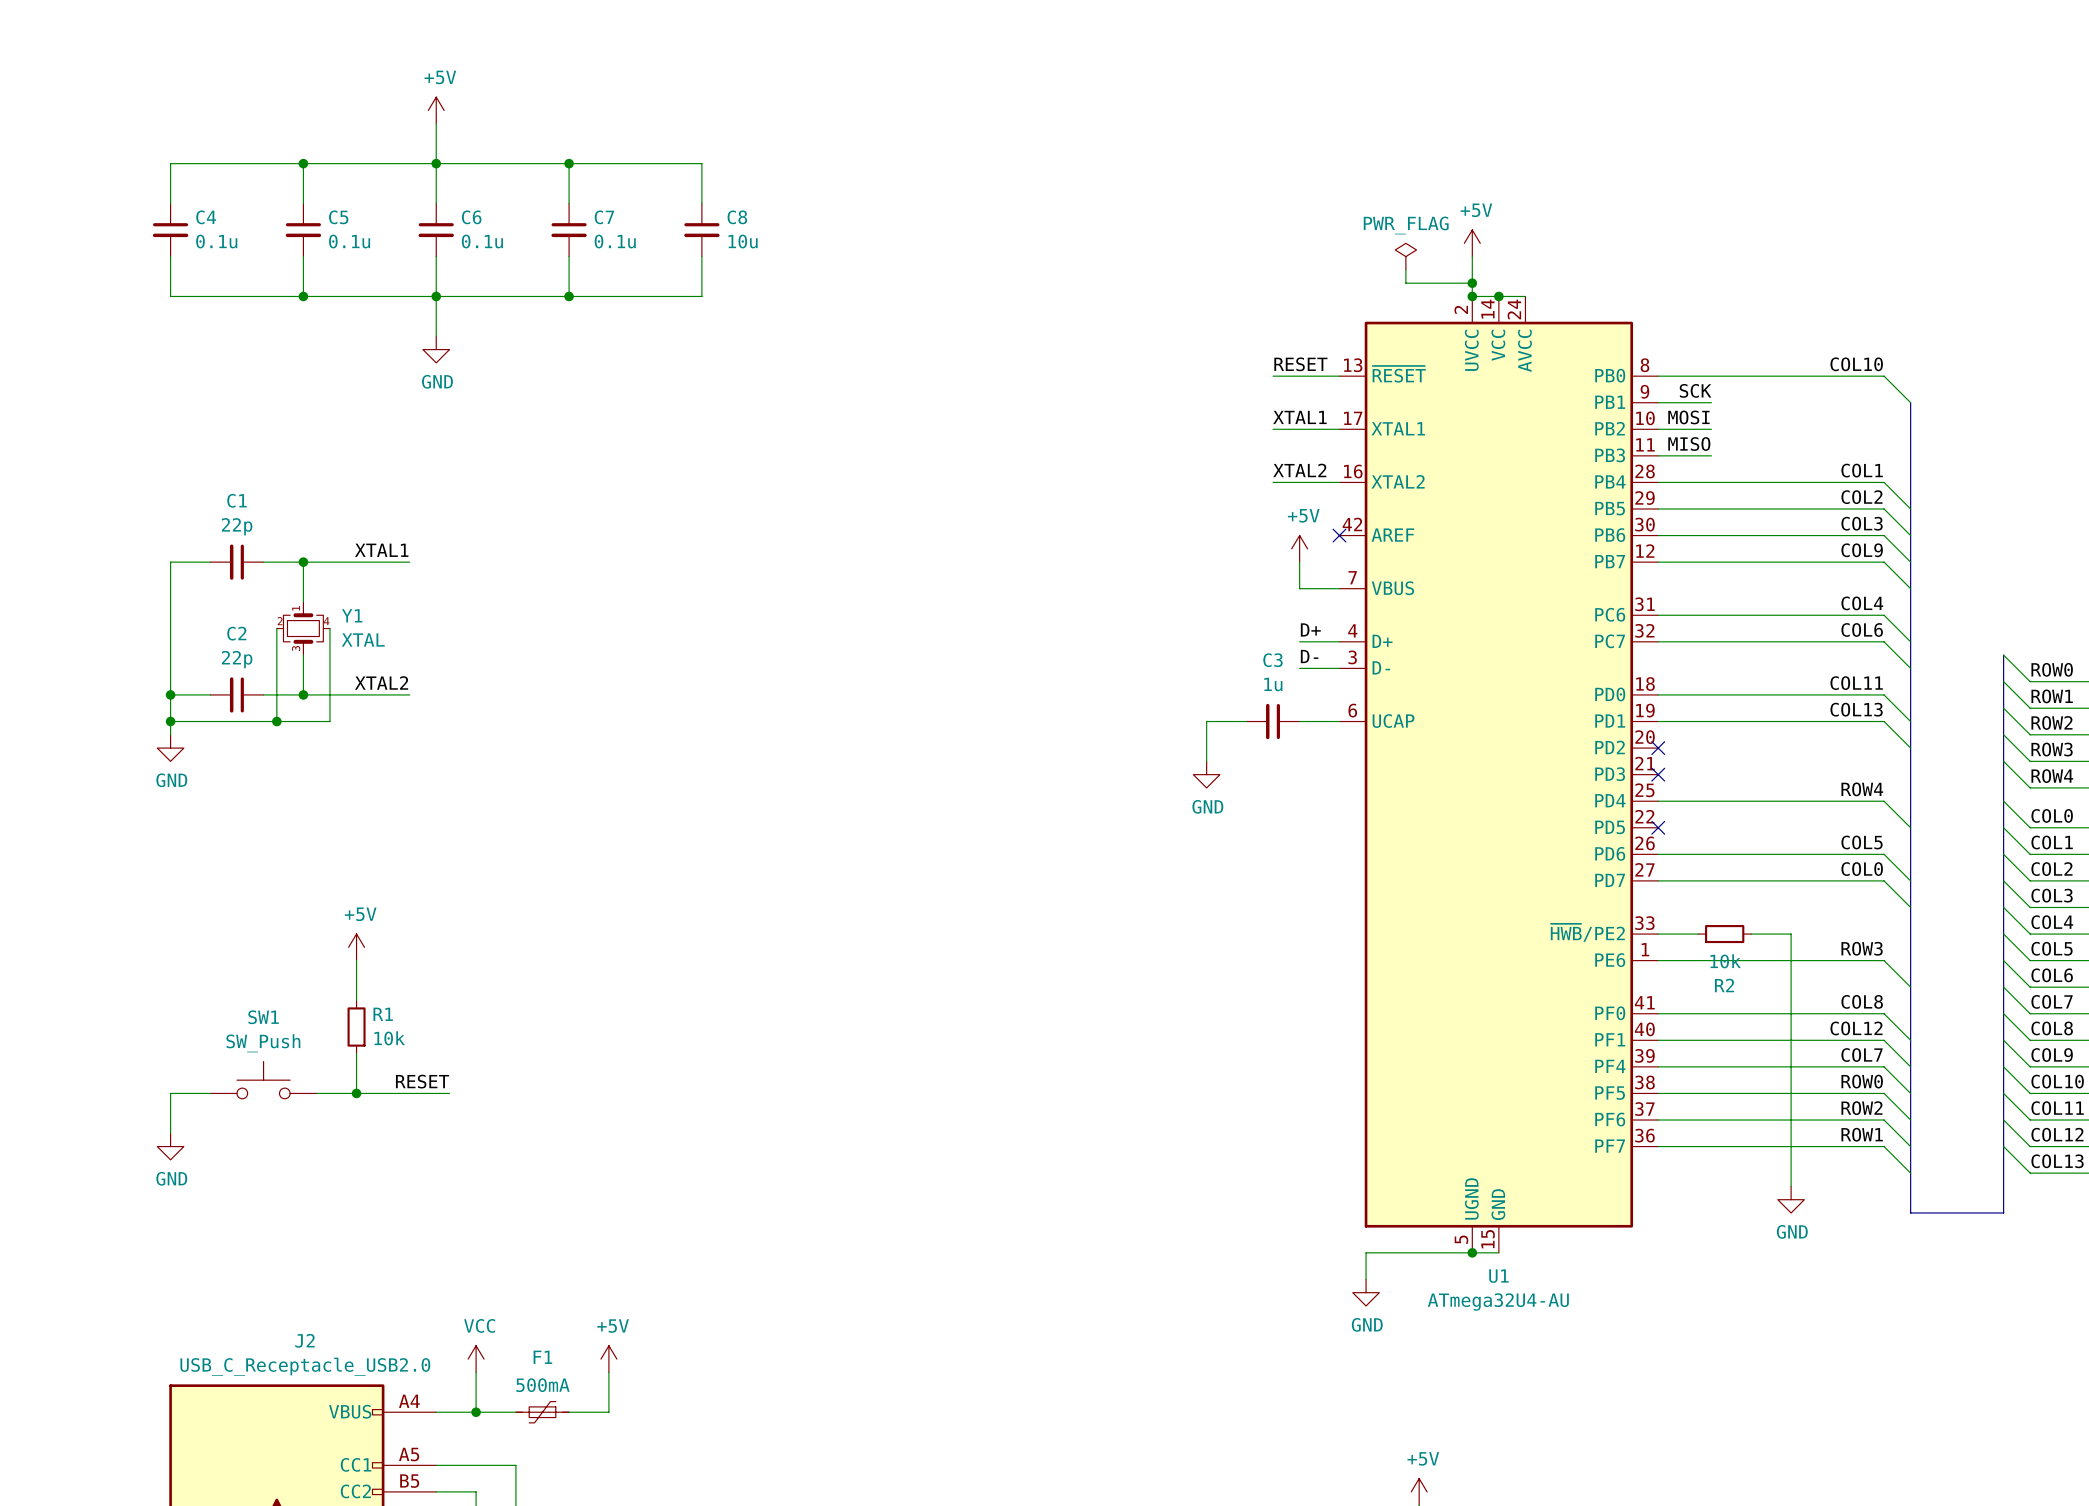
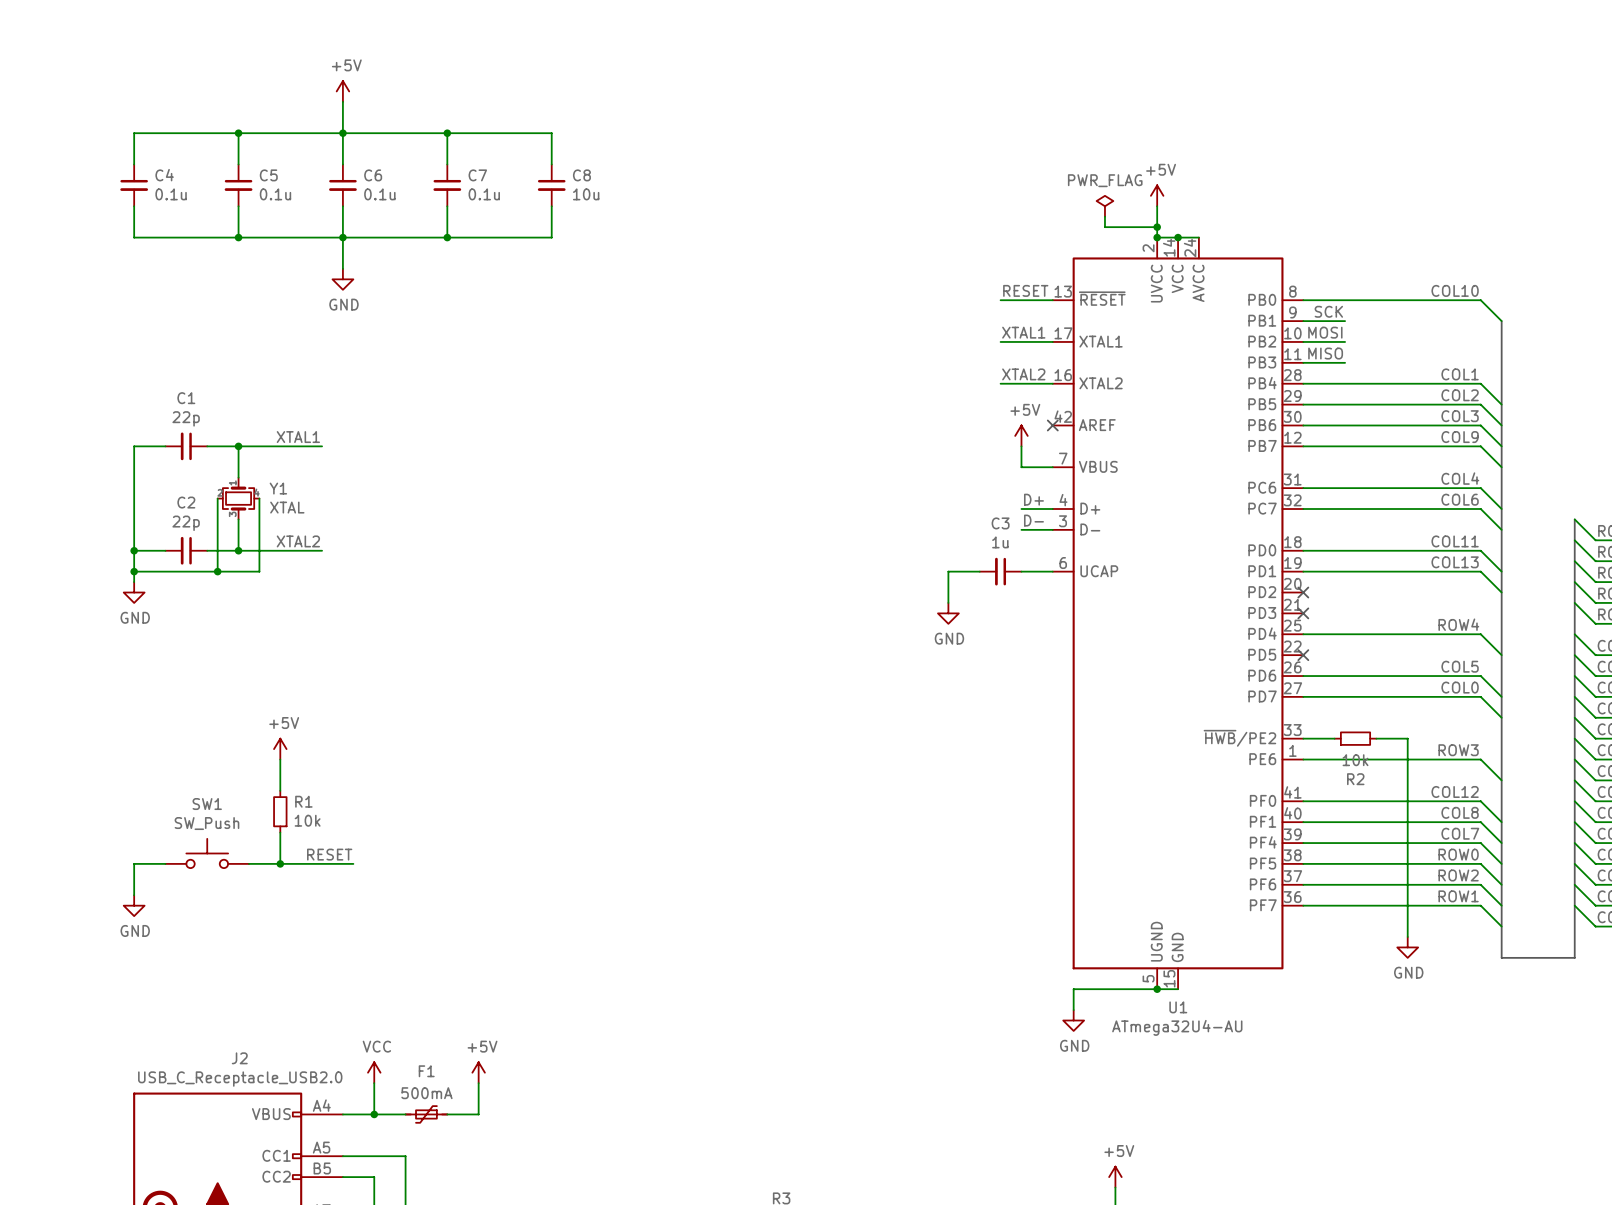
label: COL8 (1862, 1001) -> COL12 (1455, 791)
label: COL12 (1856, 1028) -> COL8 (1460, 812)

